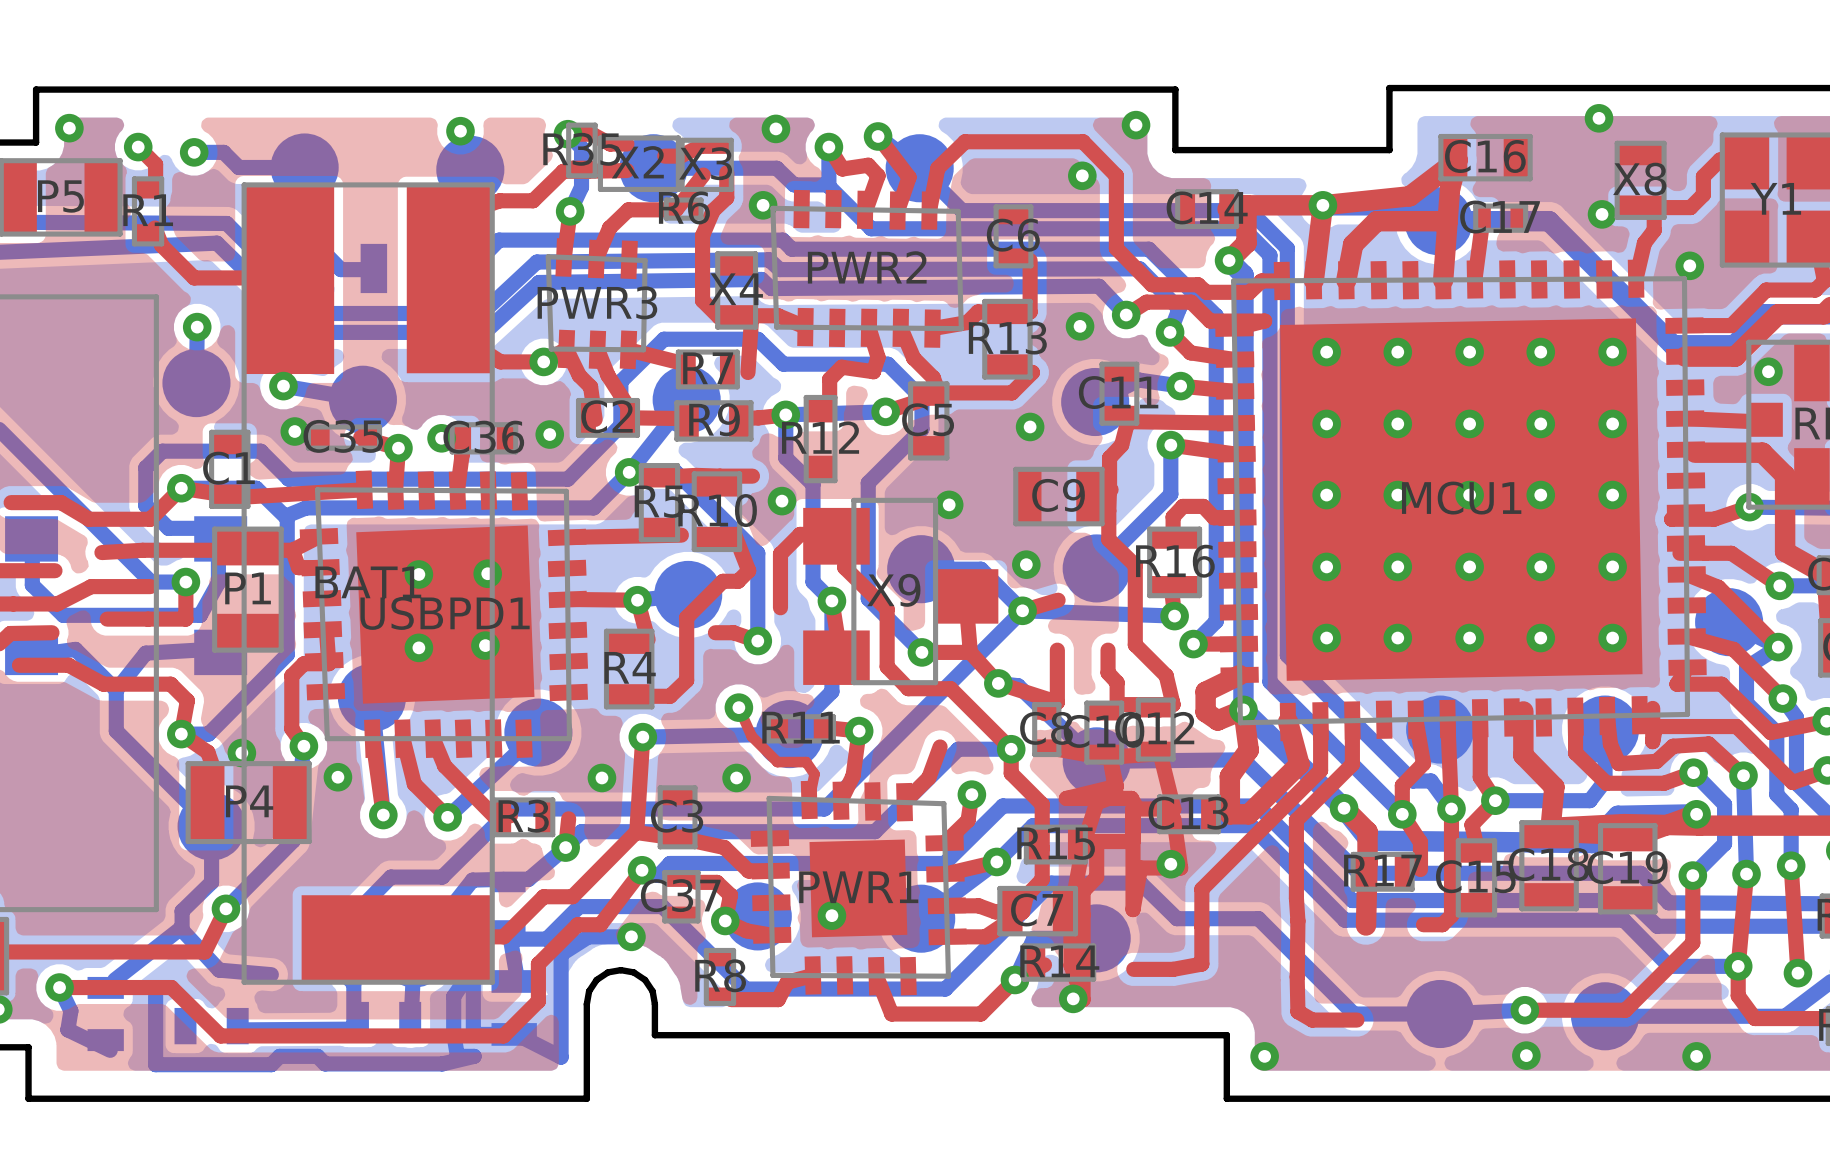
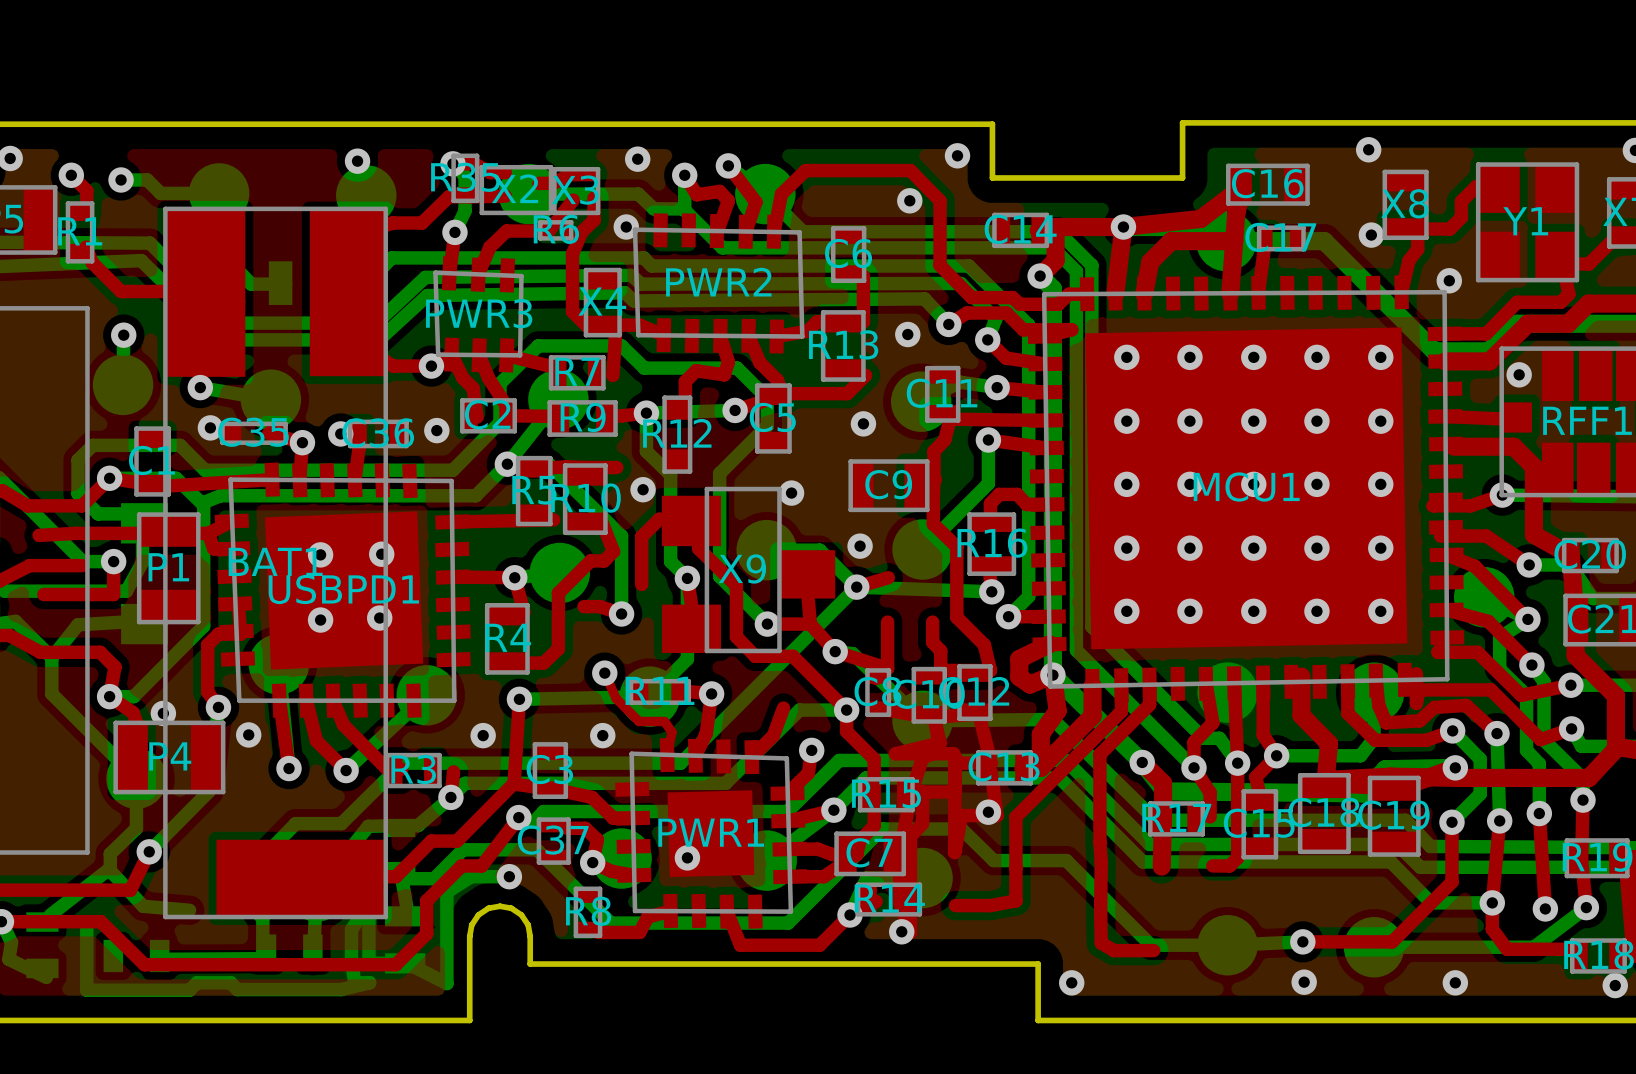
top track: (1288, 722) (1299, 764) (1248, 814) (1229, 814) -> (1092, 685) (1092, 716) (1040, 767) (1023, 767)
top track: (1352, 743) (1352, 764) (1296, 820) -> (1149, 704) (1099, 754) (1099, 773)
top track: (1320, 750) (1320, 770) (1201, 889) -> (1121, 711) (1015, 816) (1015, 834)

